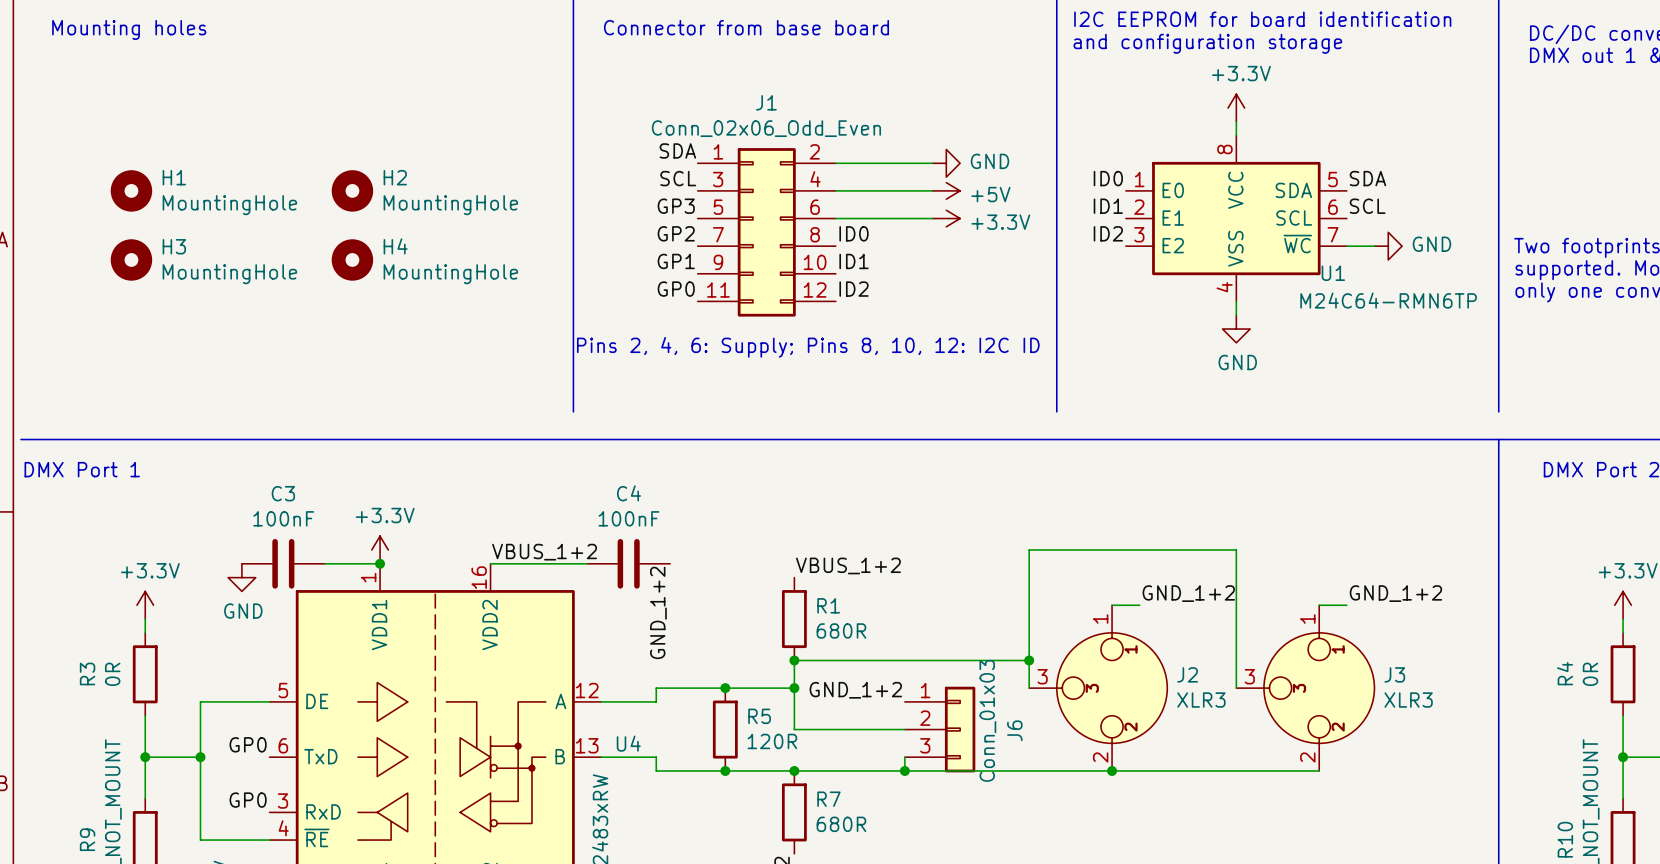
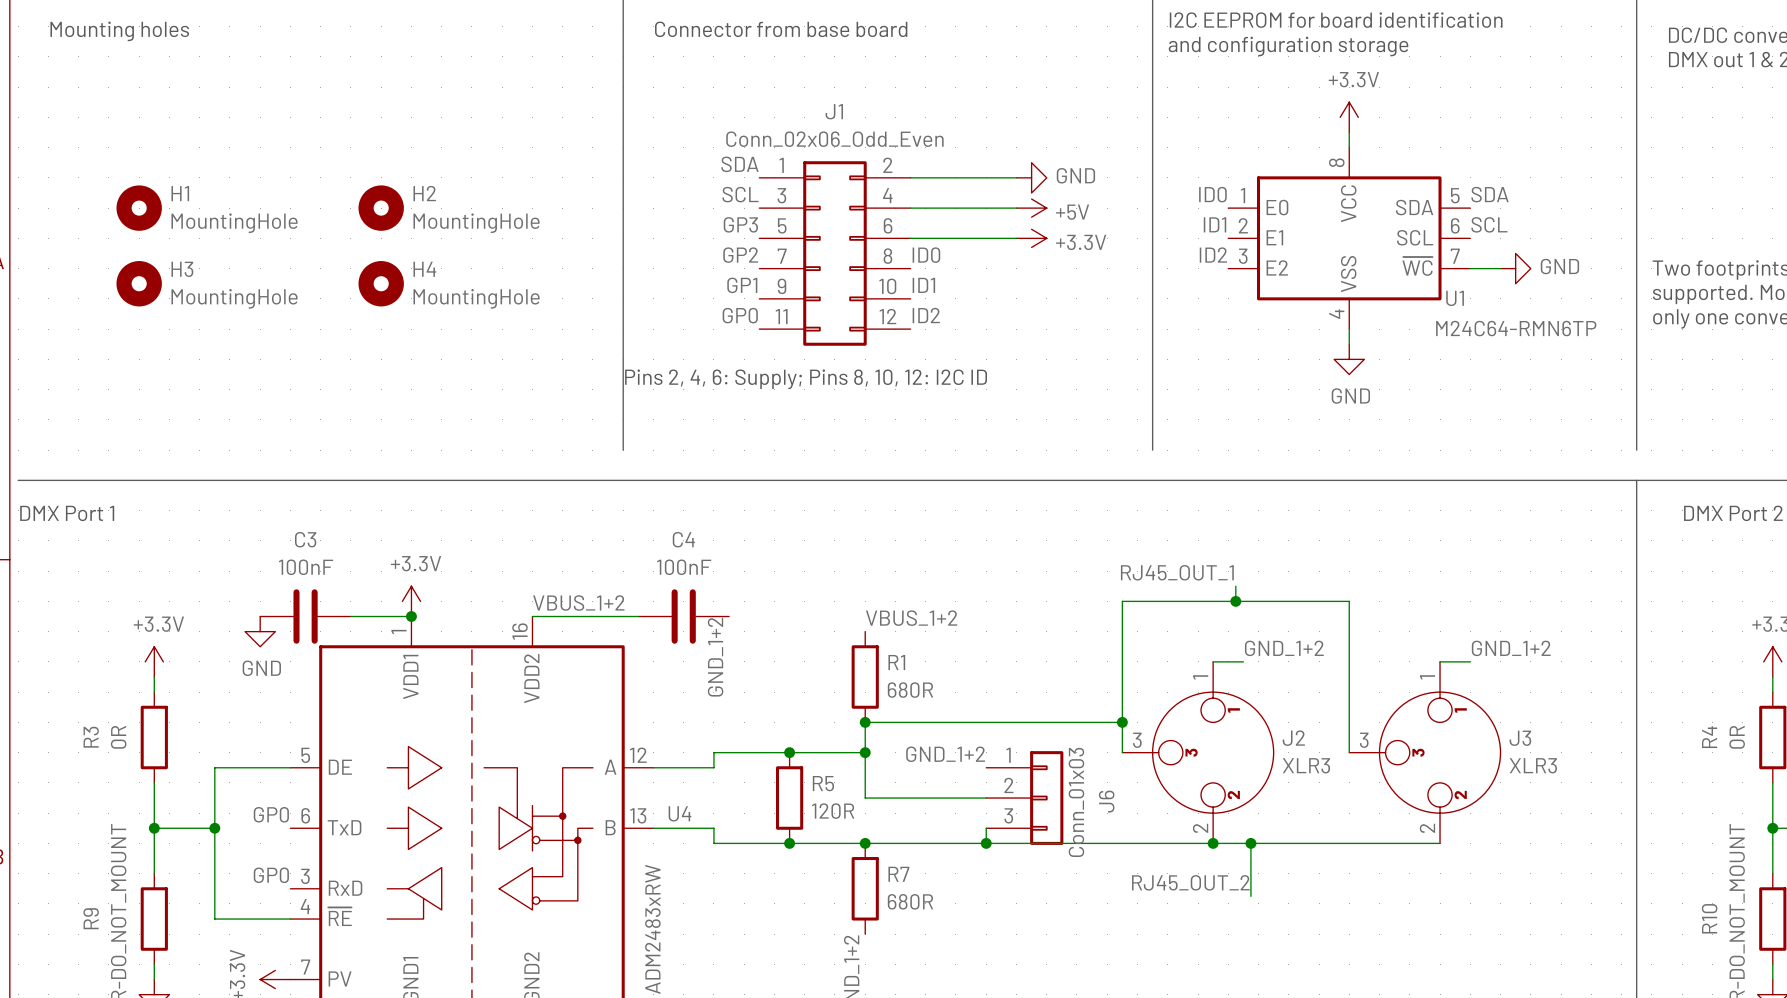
label: none -> RJ45_OUT_1 (1177, 572)
wire: none -> (1235, 586) (1235, 601)
junction: none -> (1235, 601)
wire: none -> (1250, 843) (1250, 896)
junction: none -> (1250, 843)
label: none -> RJ45_OUT_2 (1190, 882)

